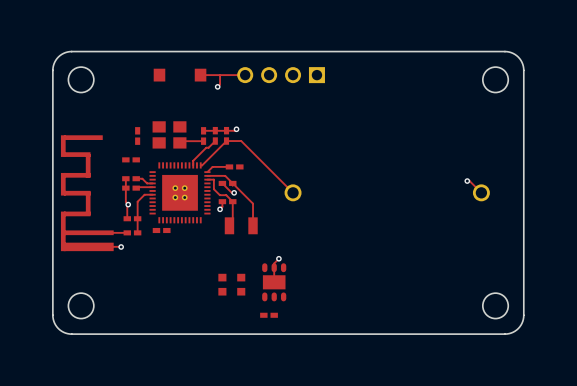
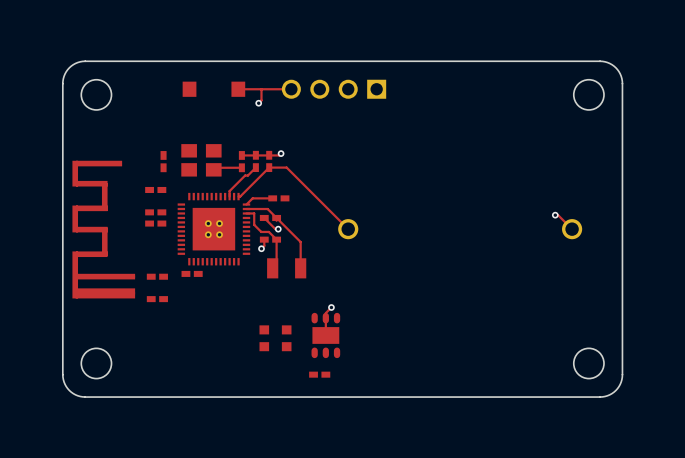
top track: (125, 178) (127, 218) -> none
top track: (136, 178) (142, 178) (147, 183) (152, 183) -> none
top track: (152, 187) (136, 188) -> none
top track: (152, 194) (144, 194) (137, 201) (137, 232) -> none
via: (128, 204) -> none
part position: (132, 218) -> (157, 299)
top track: (127, 232) (112, 232) -> none
top track: (112, 246) (121, 246) -> none
via: (121, 246) -> none

